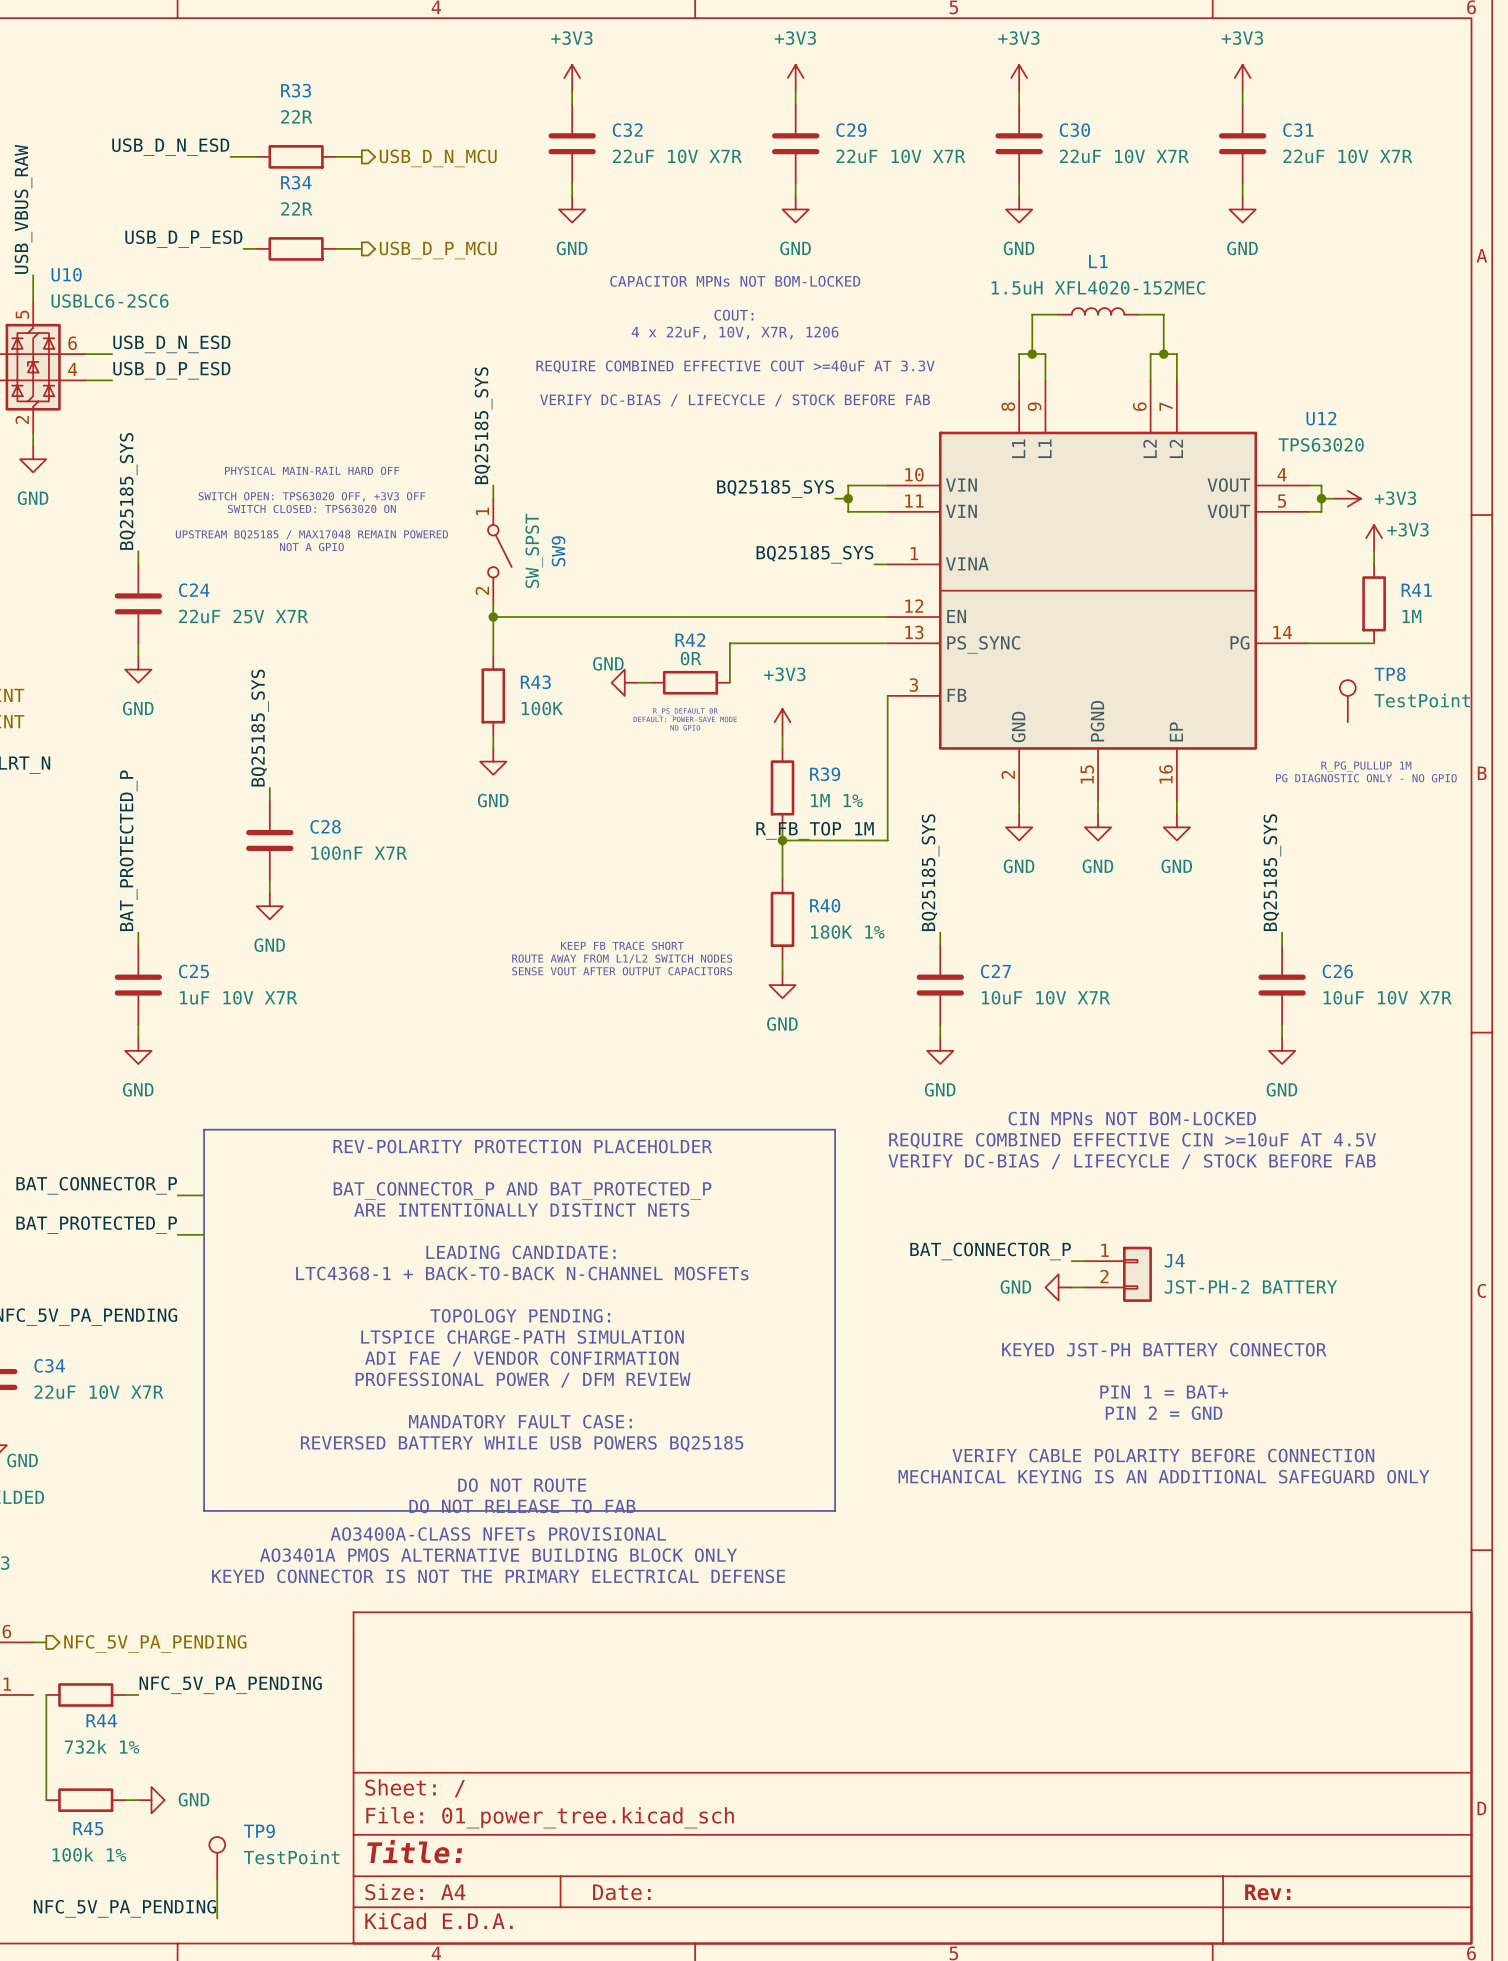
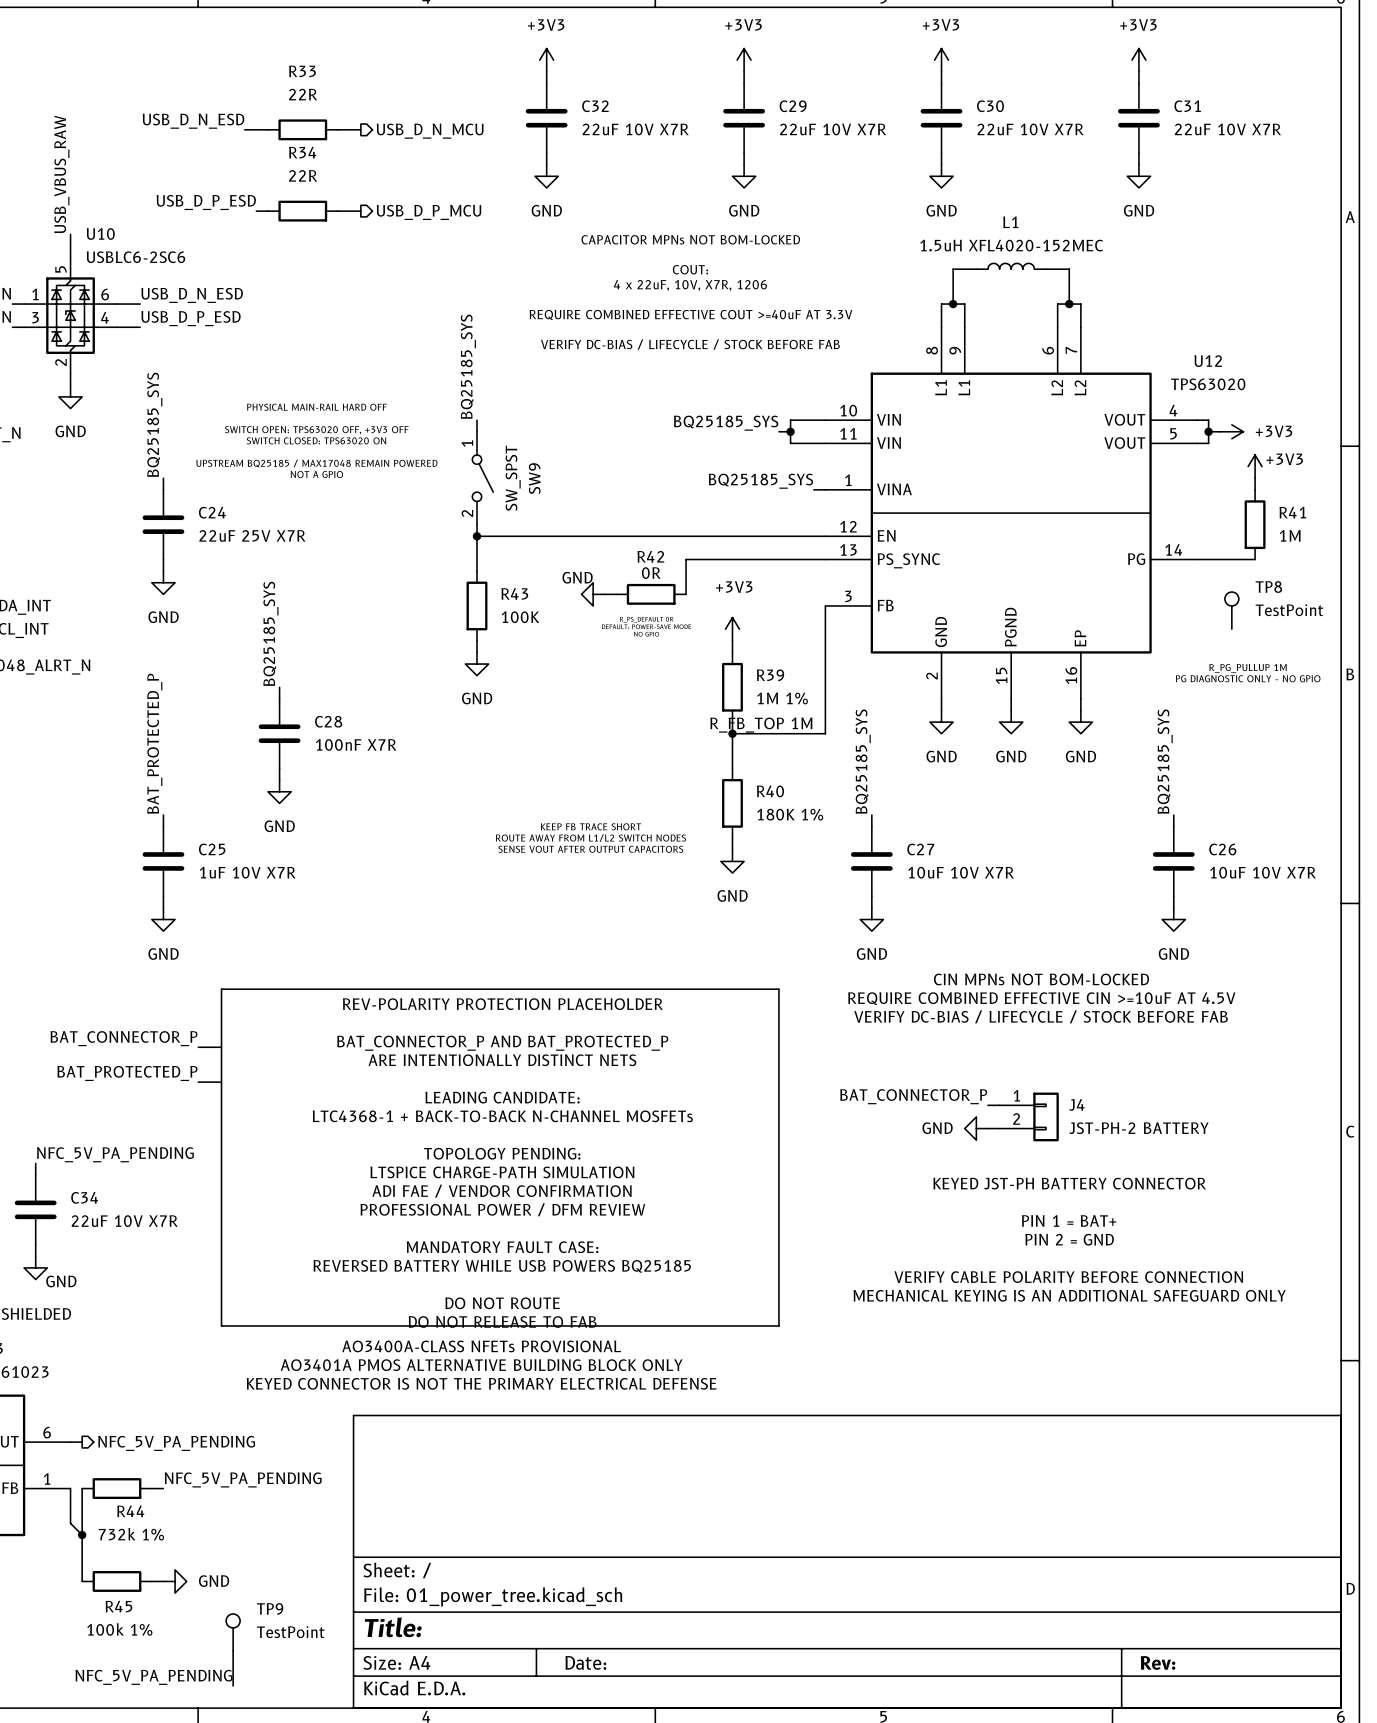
wire: none -> (70, 1488) (70, 1523) (82, 1535)
junction: none -> (82, 1535)

